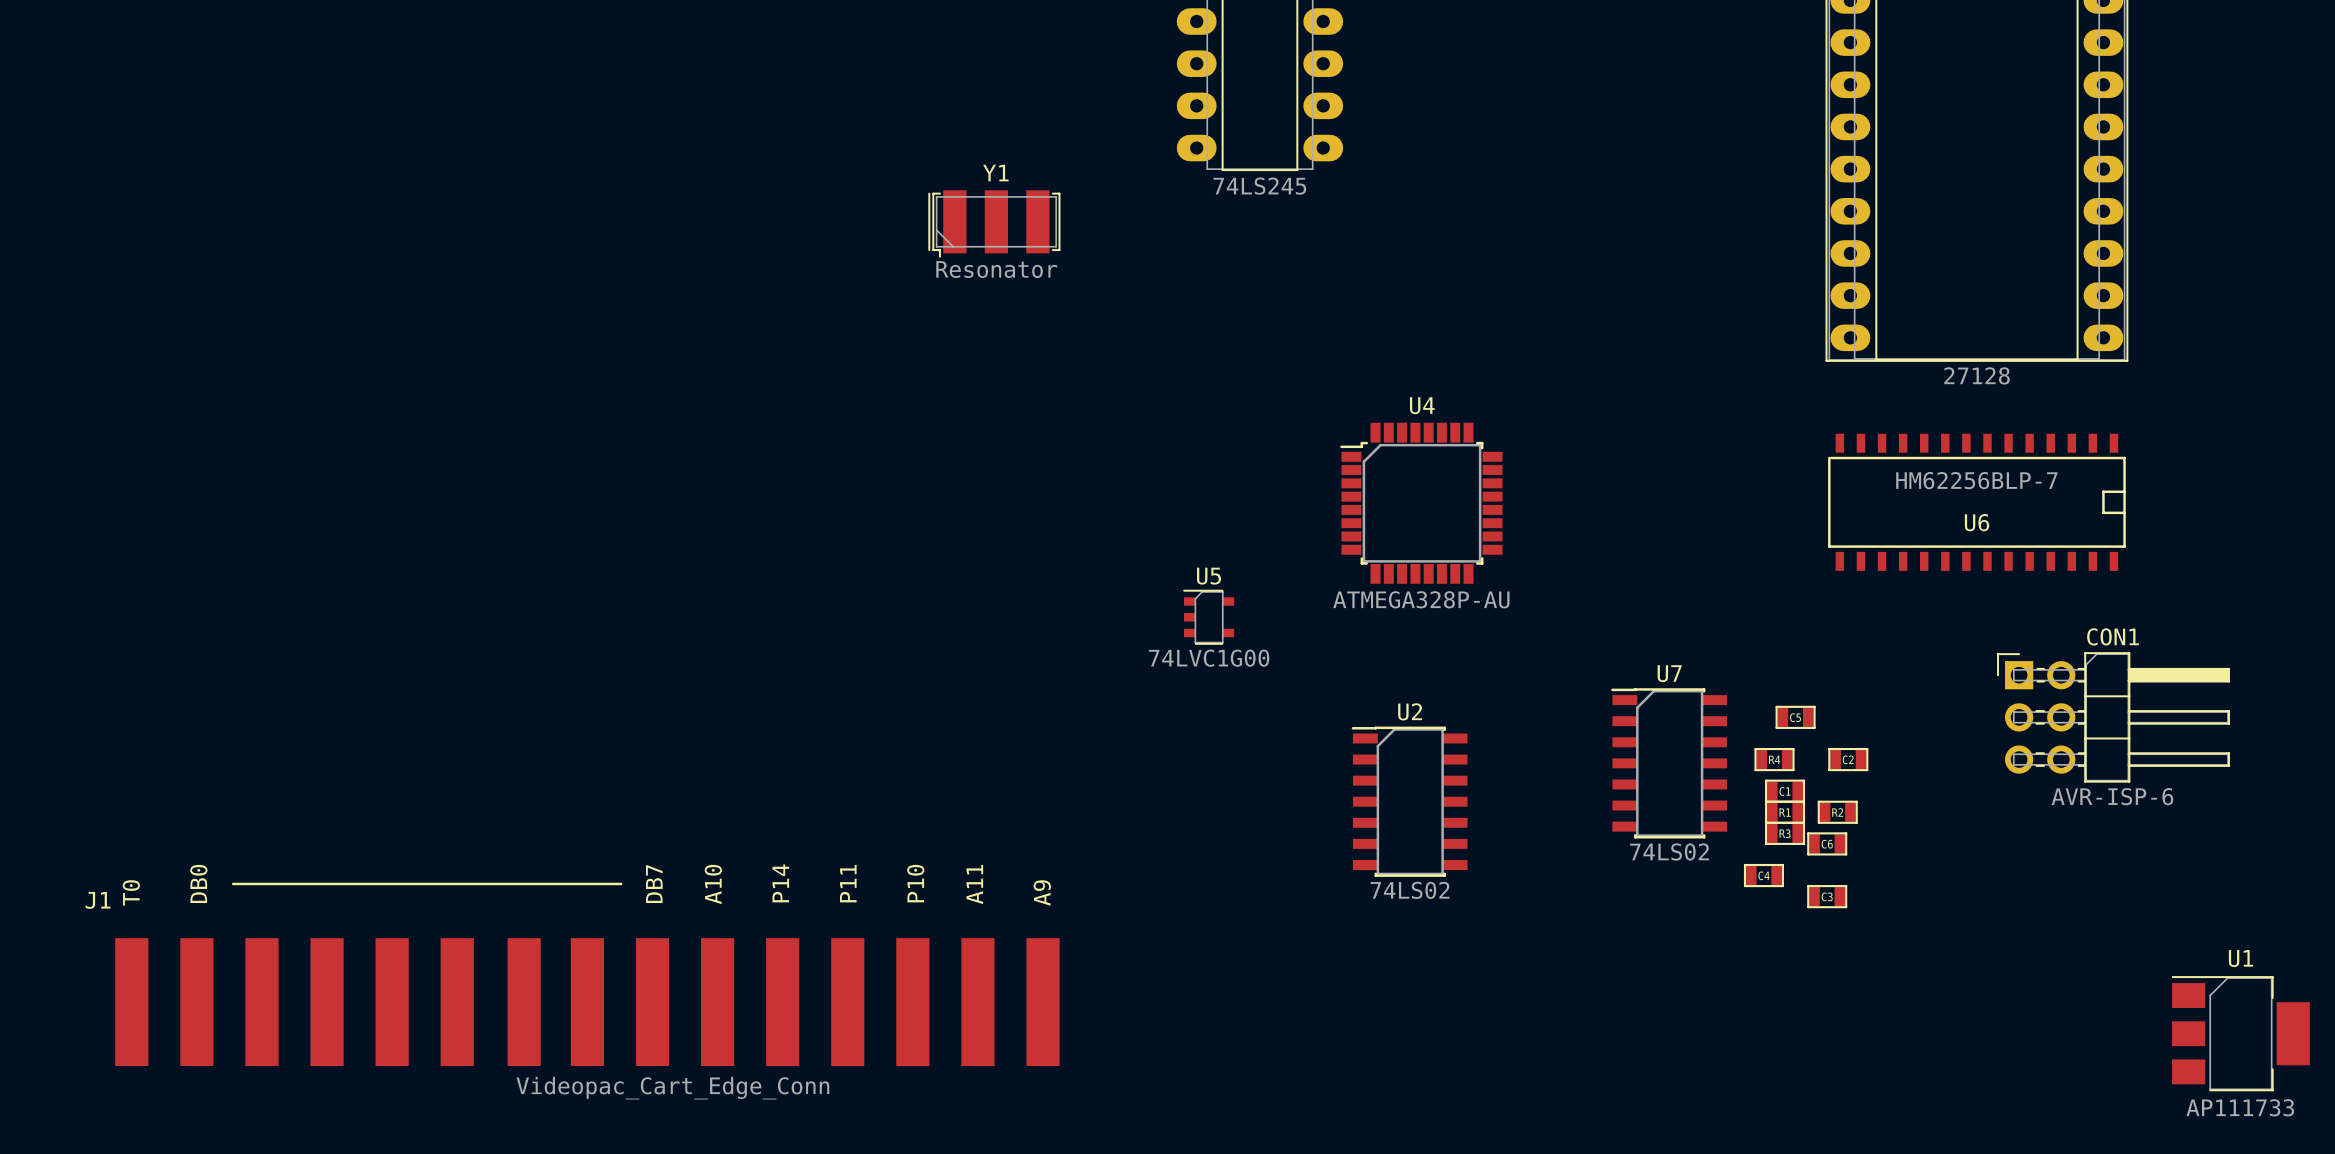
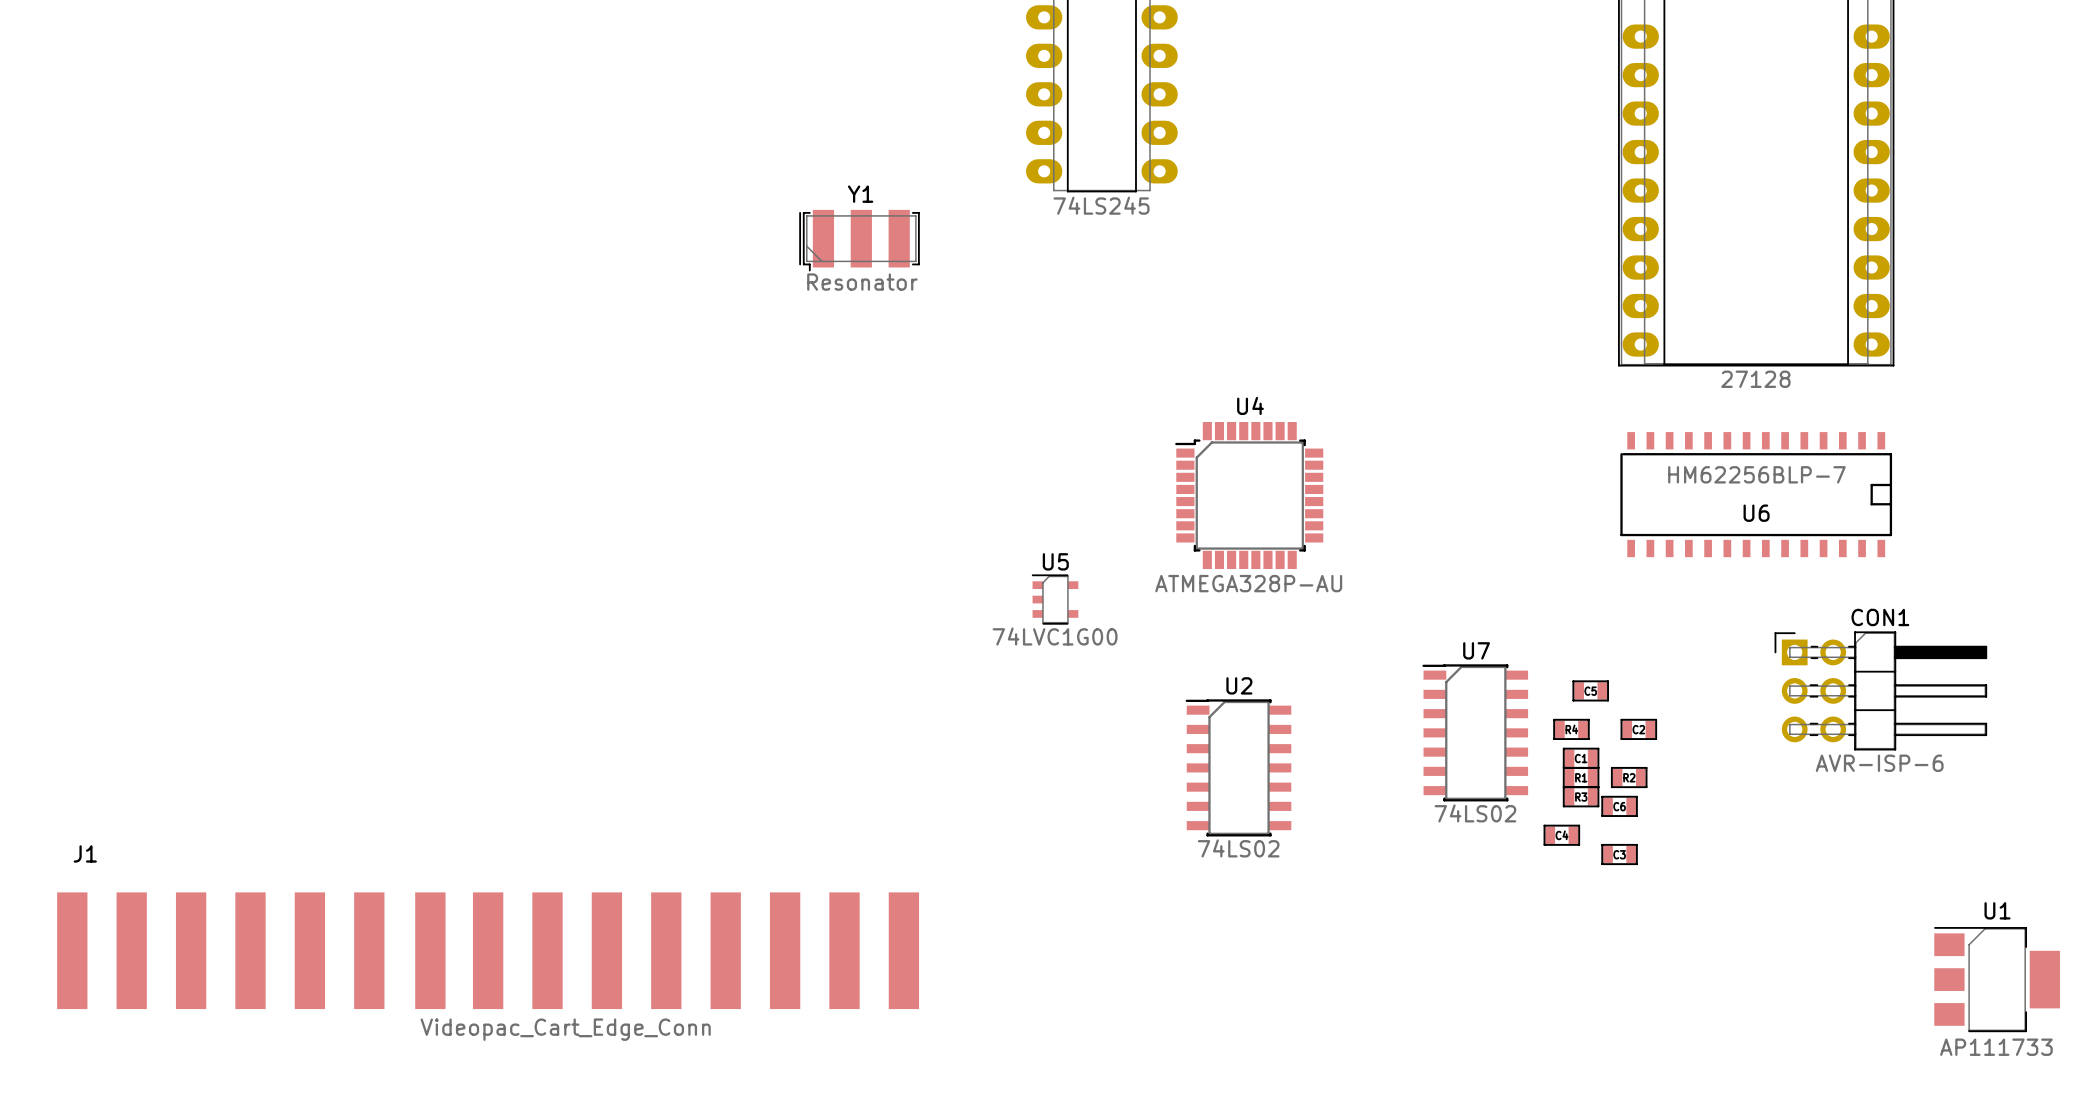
J1 footprint: [115, 882, 1060, 1066] -> [57, 892, 920, 1010]
J1 name position: J1 (98, 900) -> J1 (85, 853)

